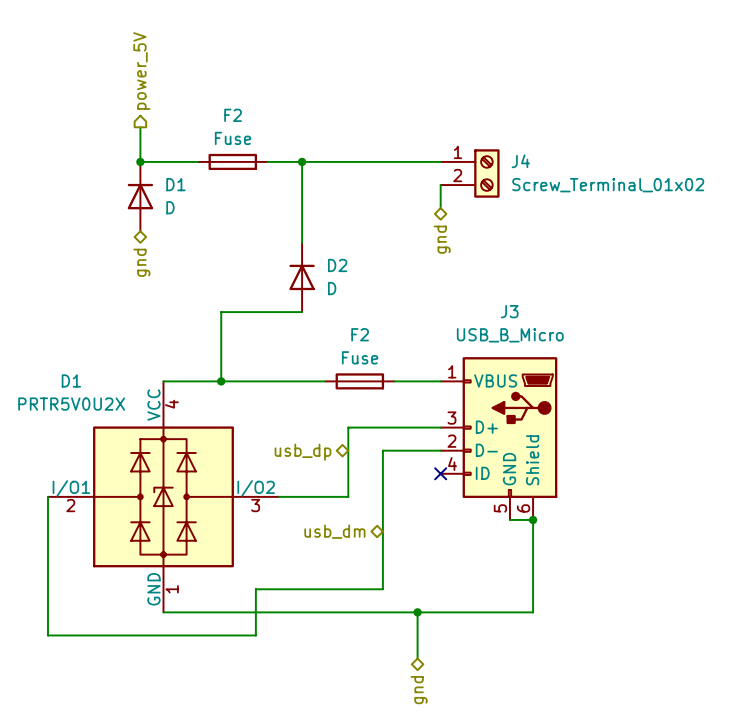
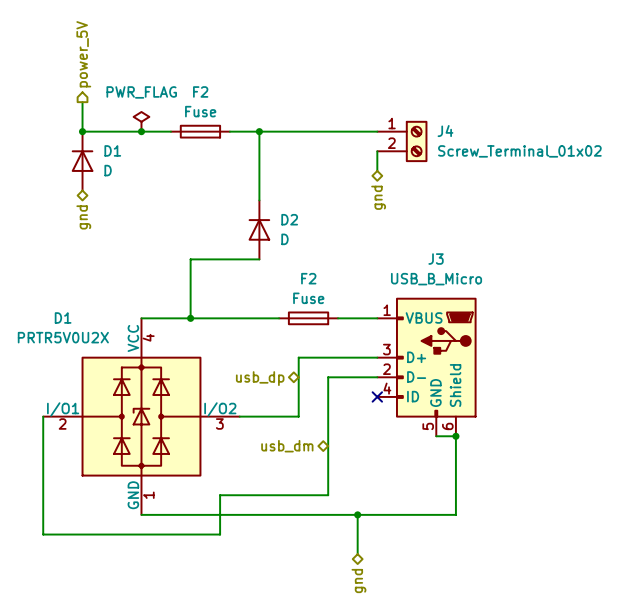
hierarchical label position: power_5V (141, 71) -> power_5V (83, 54)
wire: (140, 127) (140, 161) -> (82, 102) (82, 131) (121, 131)
power symbol: none -> PWR_FLAG (141, 121)
junction: none -> (82, 131)
junction: (140, 161) -> none
junction: none -> (141, 131)
D1 position: (140, 196) -> (82, 161)
hierarchical label position: gnd (141, 262) -> gnd (83, 217)

